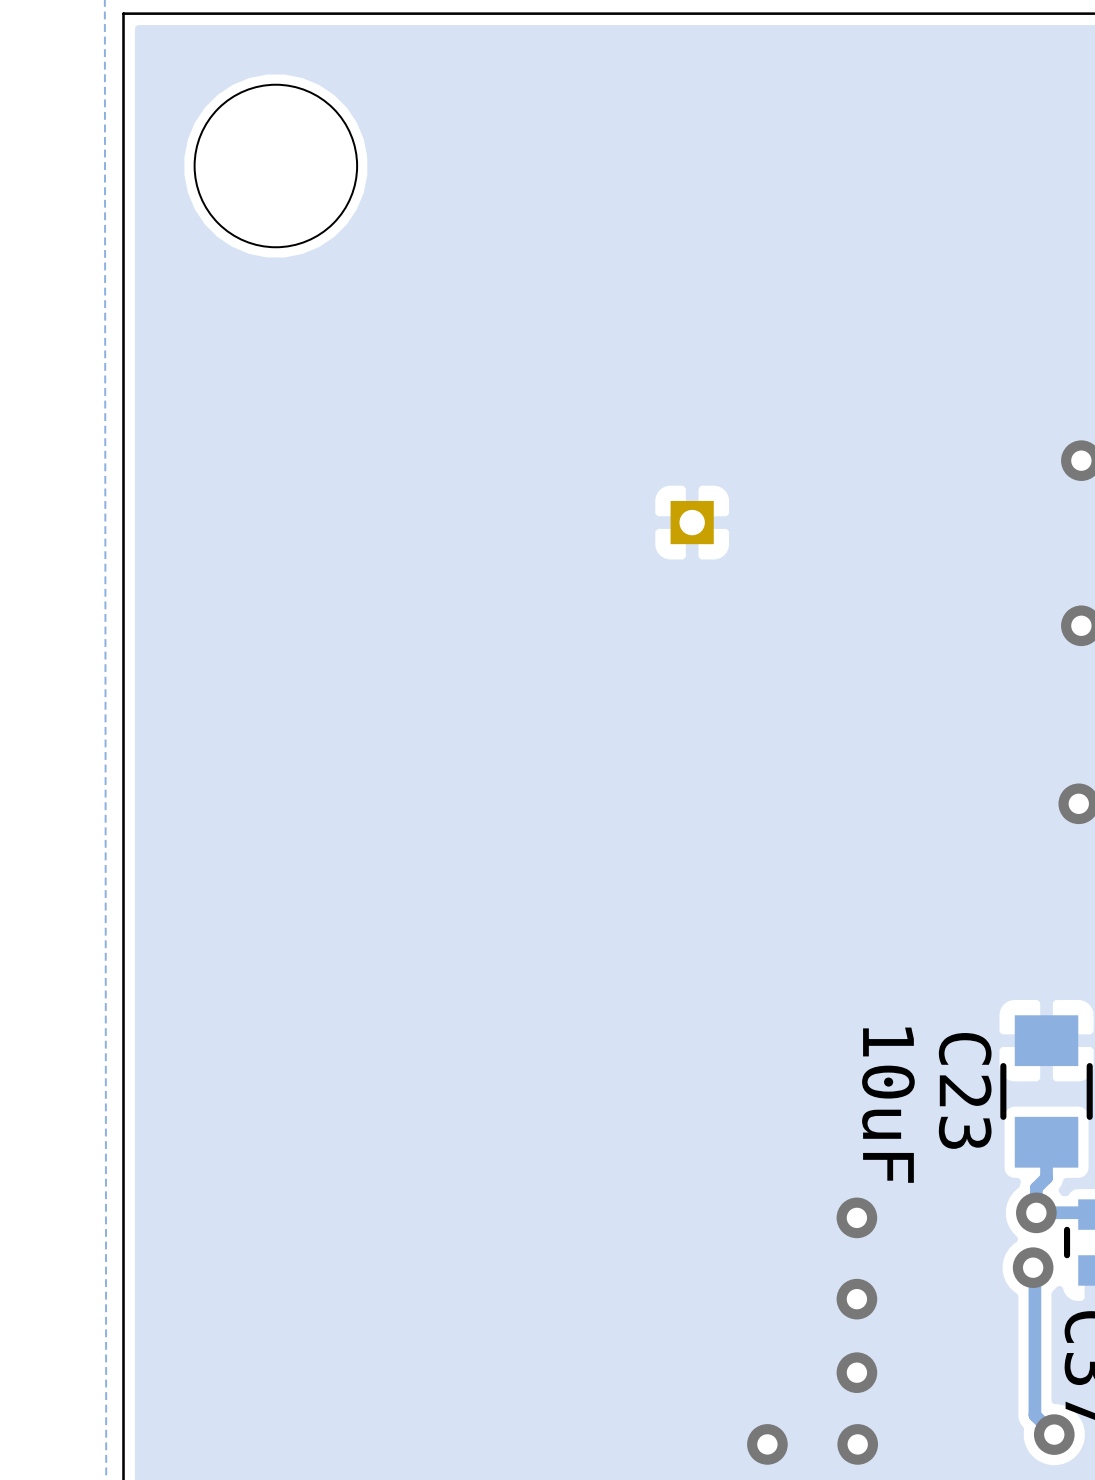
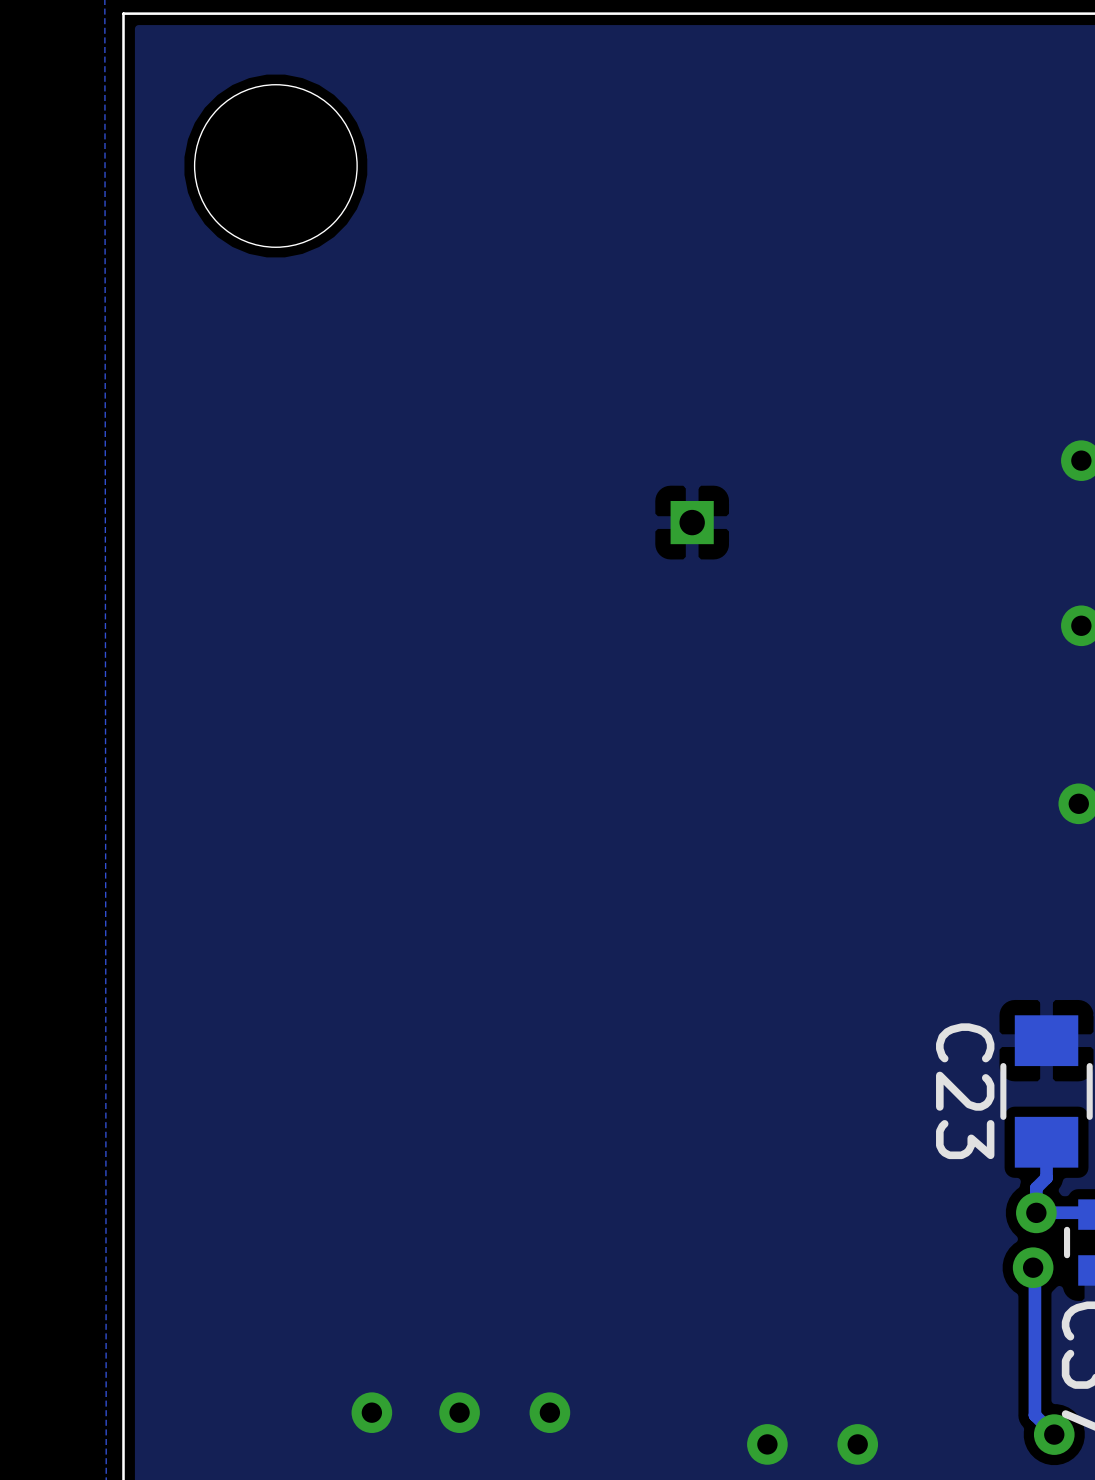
C23 value: 10uF (888, 1105) -> none
via: (856, 1217) -> none
via: (856, 1299) -> none
via: (856, 1372) -> none
via: none -> (371, 1412)
via: none -> (459, 1412)
via: none -> (549, 1412)

